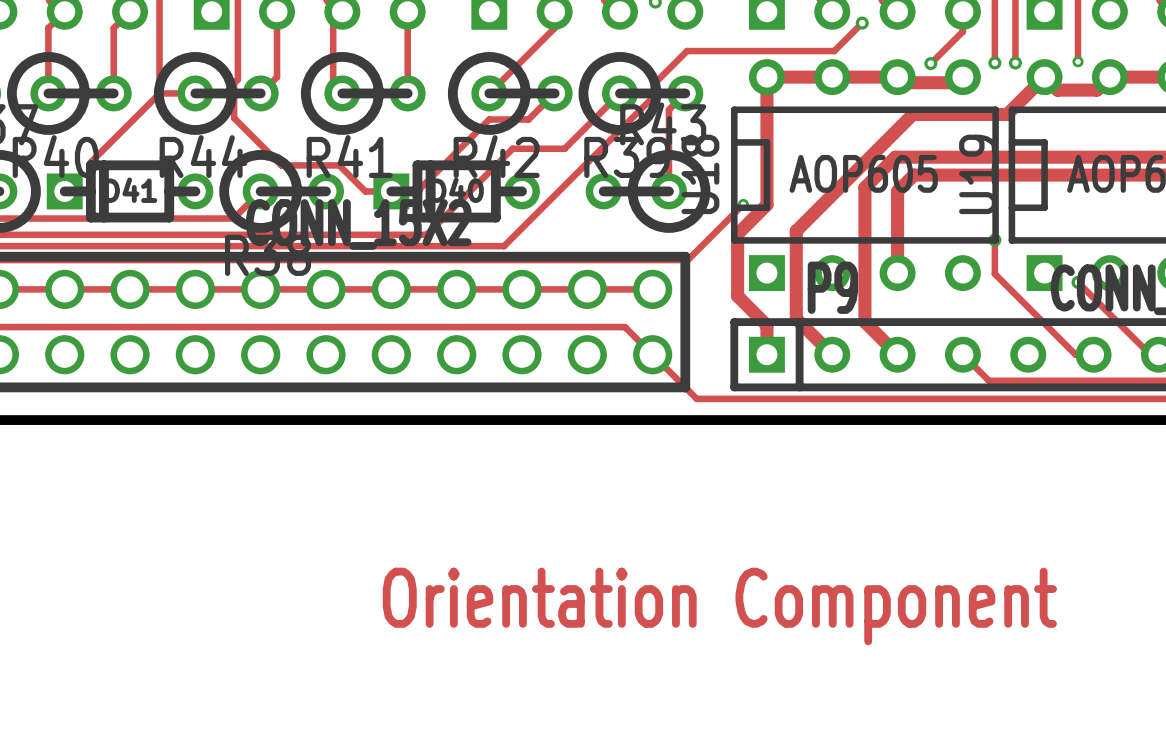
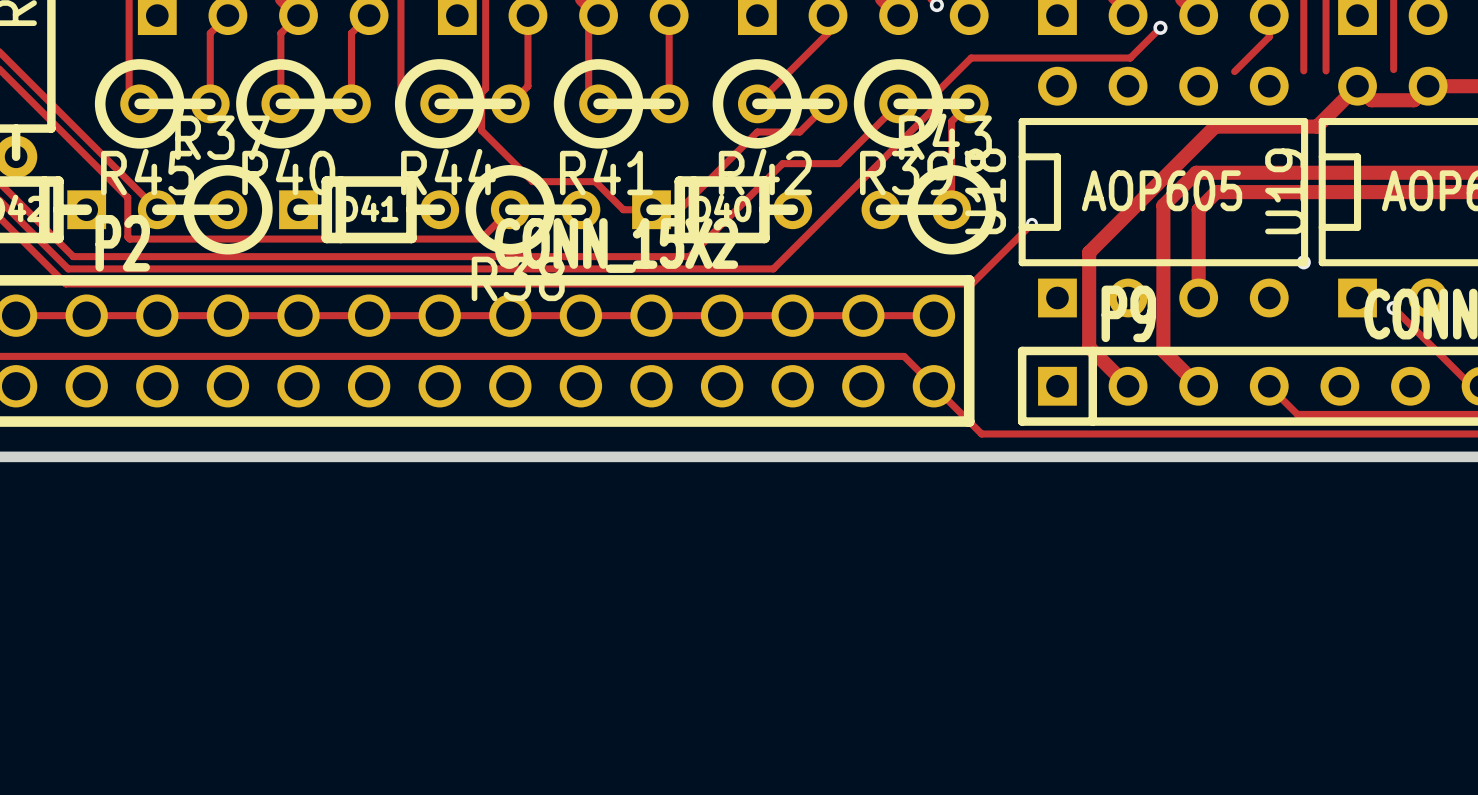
via: (1078, 61) -> none
via: (994, 62) -> none
via: (930, 63) -> none
via: (1015, 63) -> none
track: (962, 77) (957, 82) (903, 82) (897, 77) (766, 77) (766, 204) (737, 234) (737, 296) (766, 325) (766, 354) -> none
track: (195, 93) (159, 93) (90, 162) (90, 191) (64, 191) -> none
track: (994, 240) (994, 273) (1075, 354) (1093, 354) -> none
text: Orientation Component (719, 606) -> none

